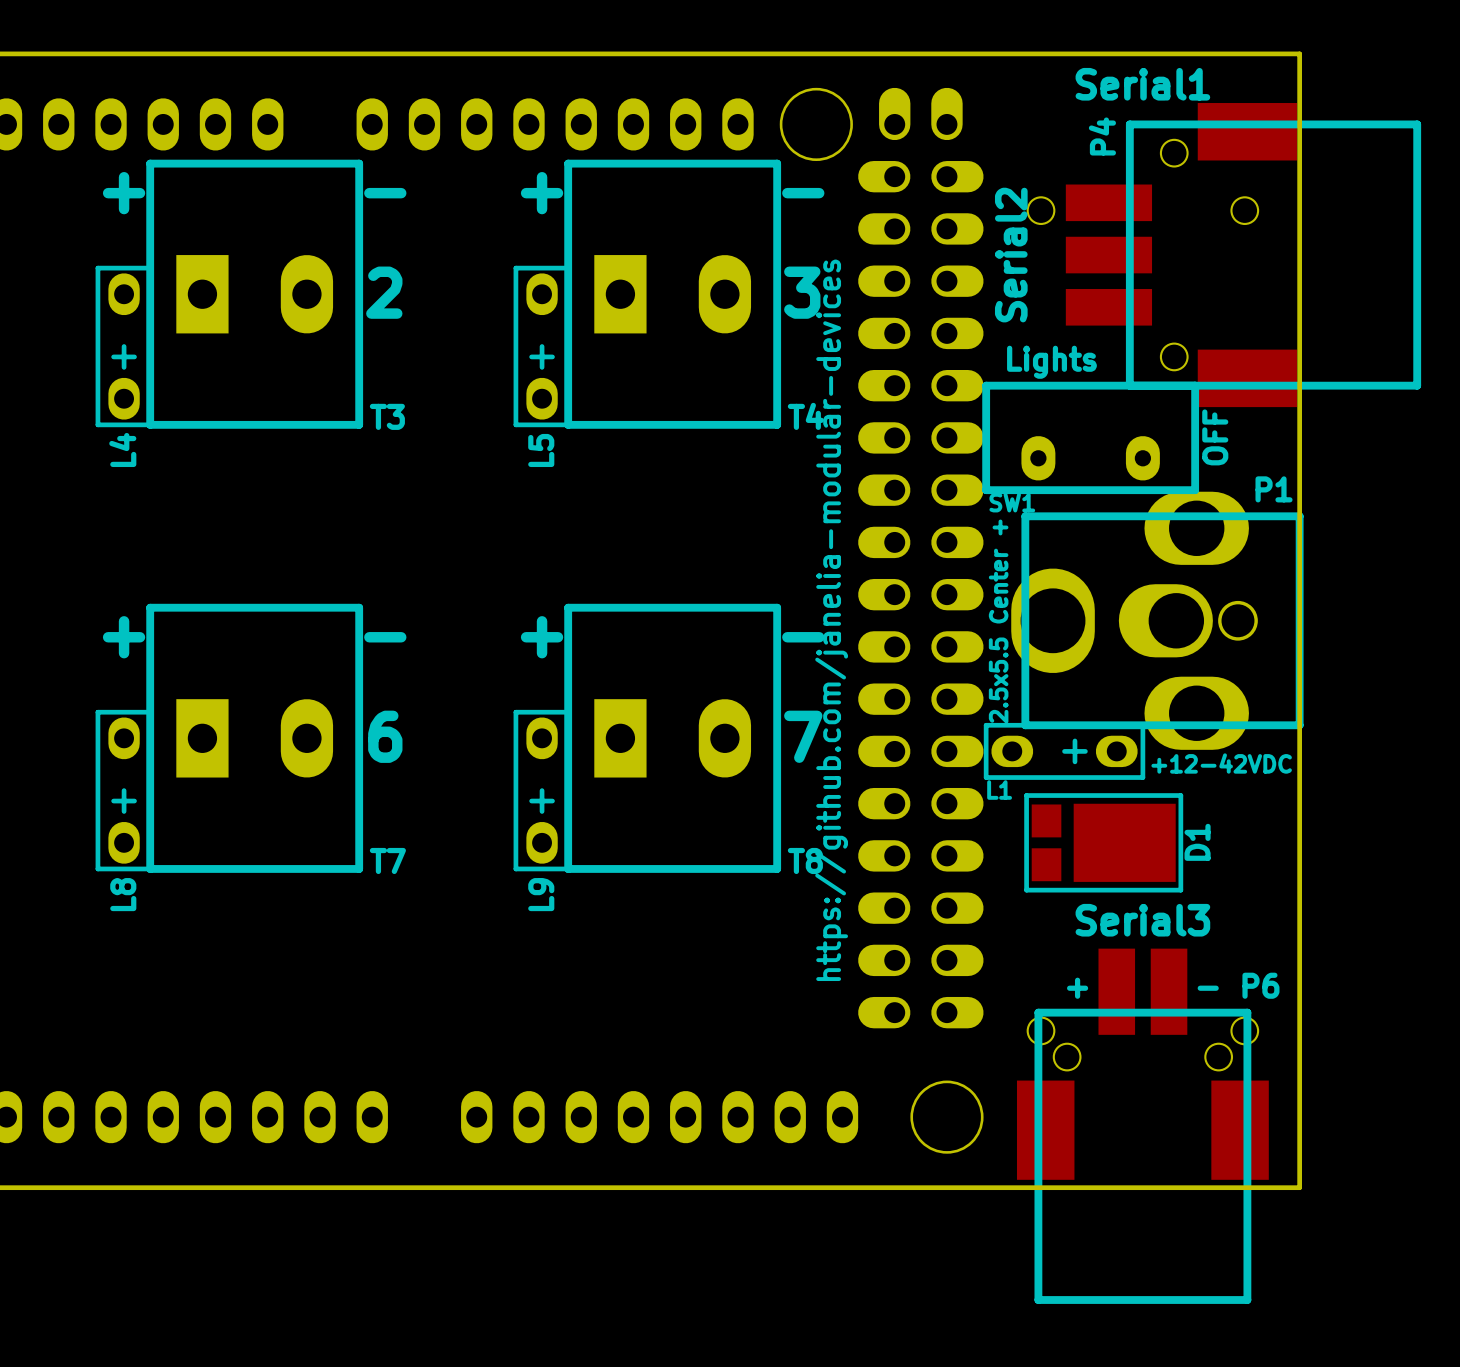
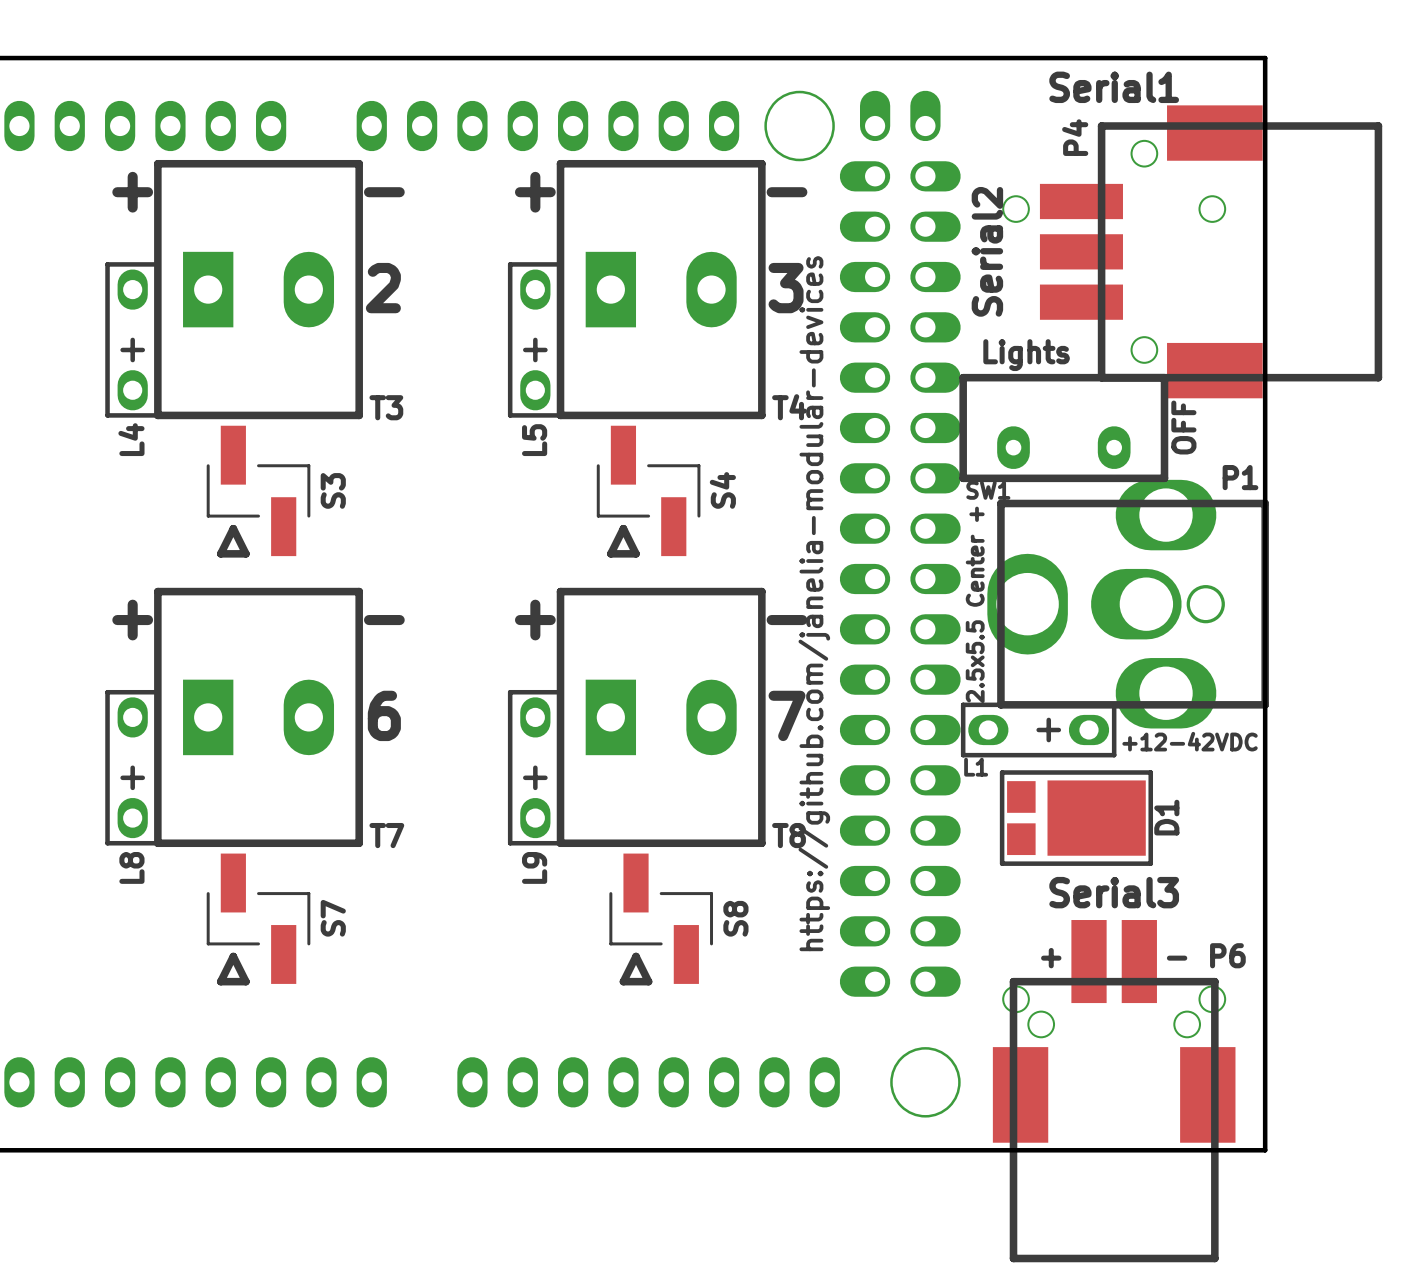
S3: none -> (258, 491)
S4: none -> (648, 491)
S7: none -> (258, 919)
S8: none -> (661, 919)

